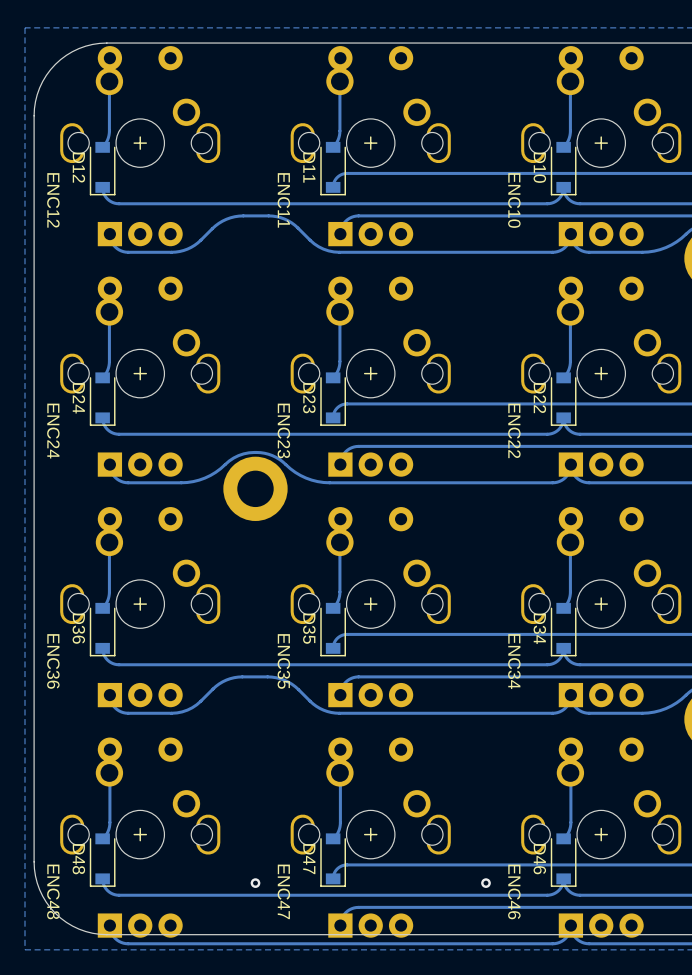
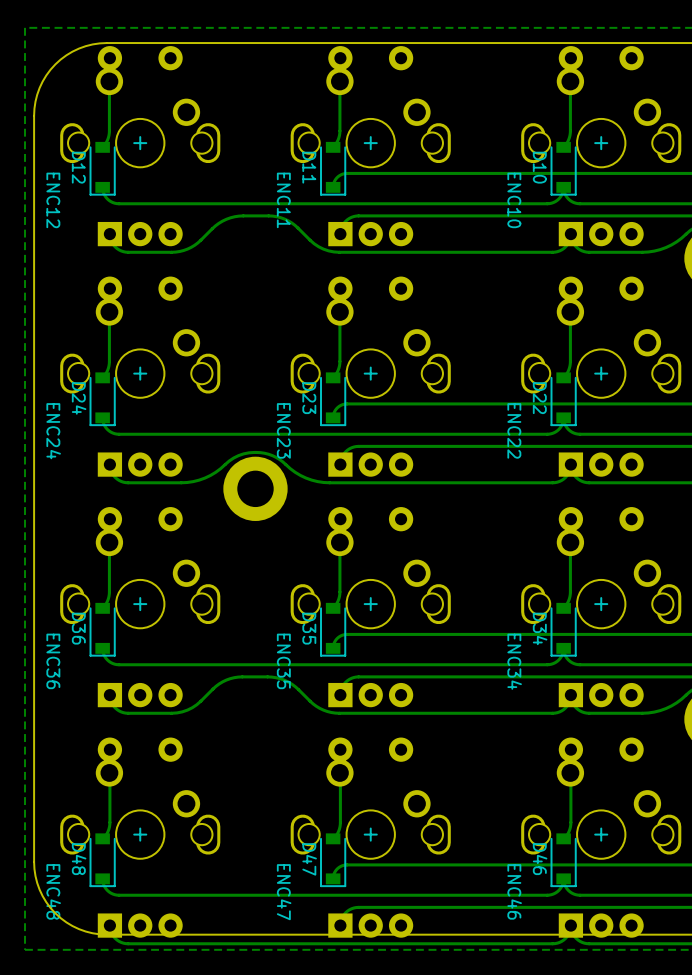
via: (255, 883) -> none
via: (485, 883) -> none

